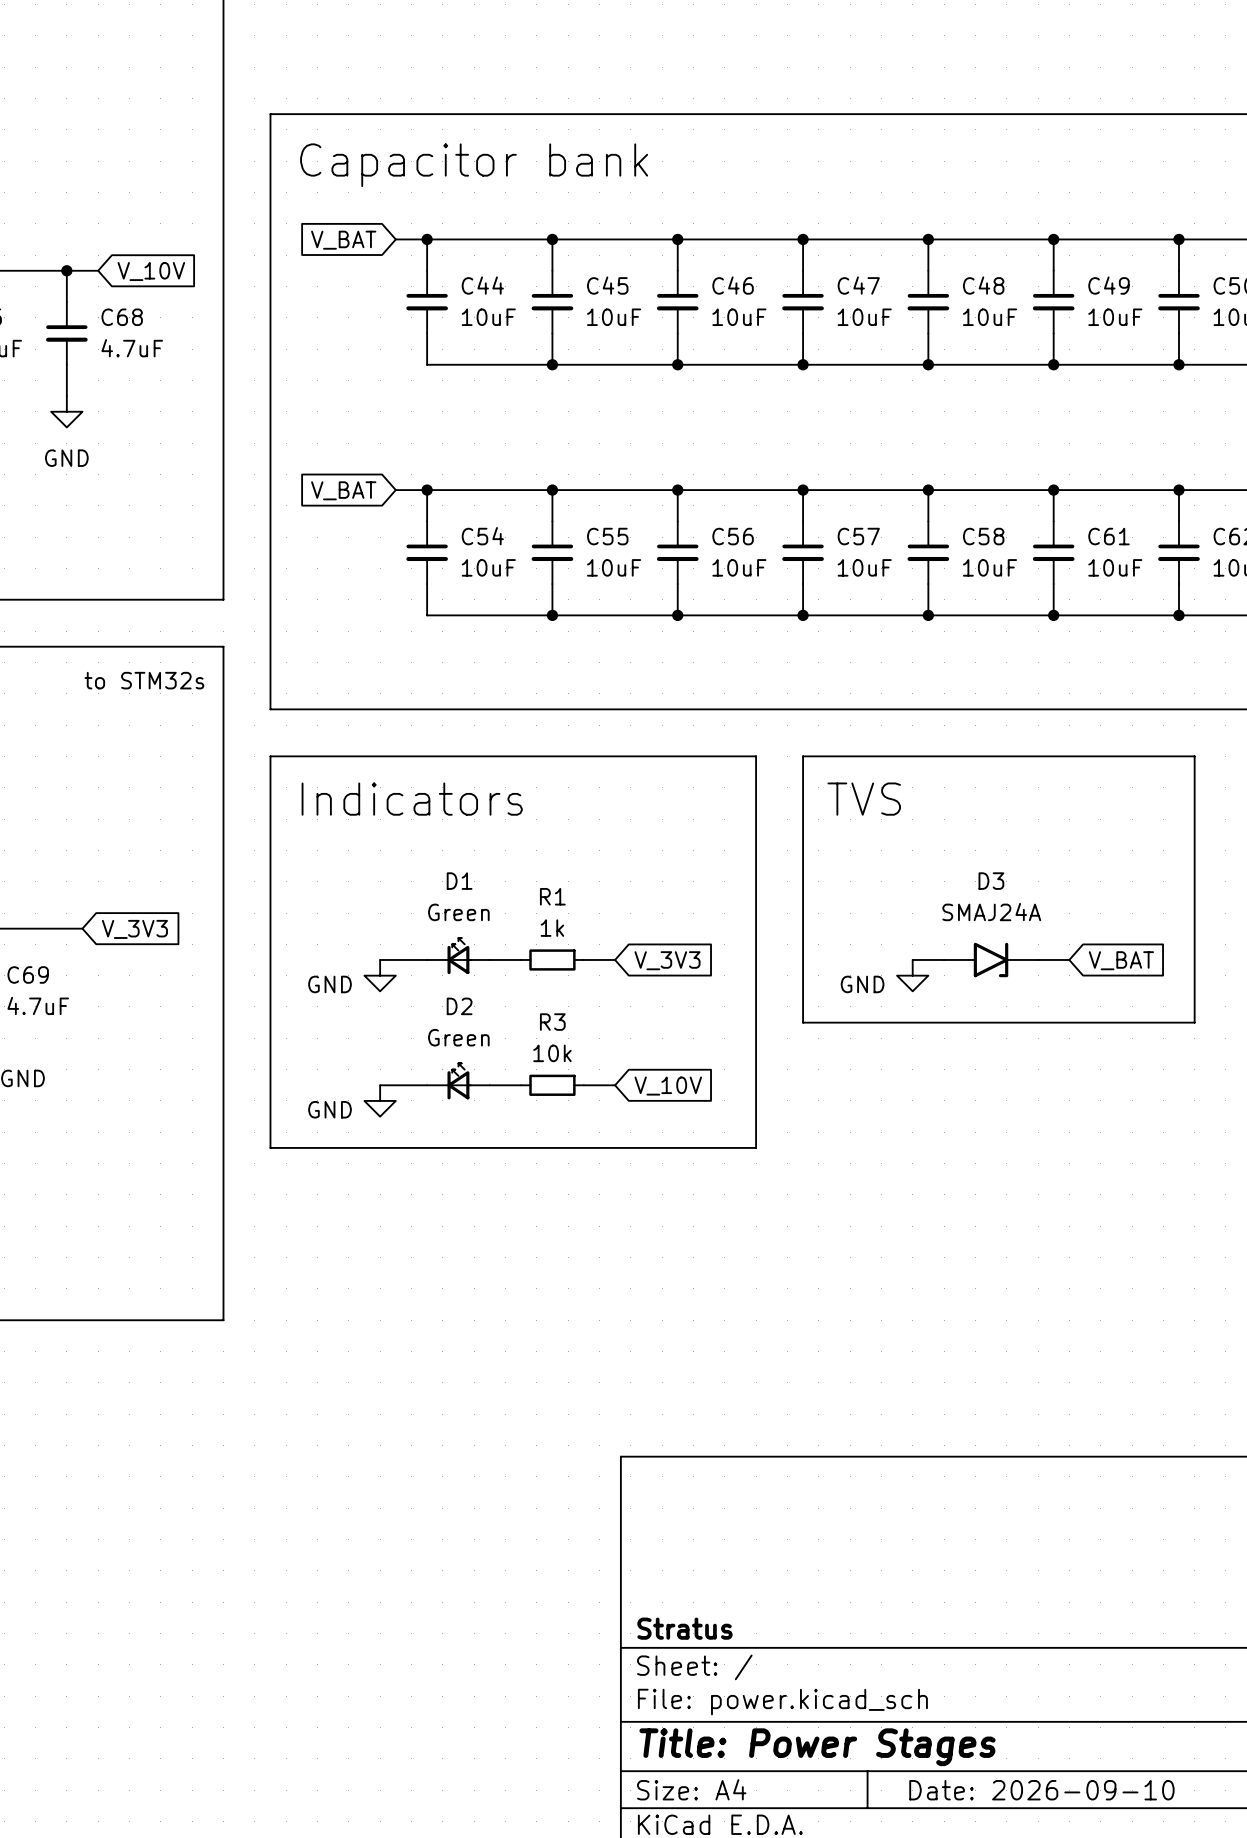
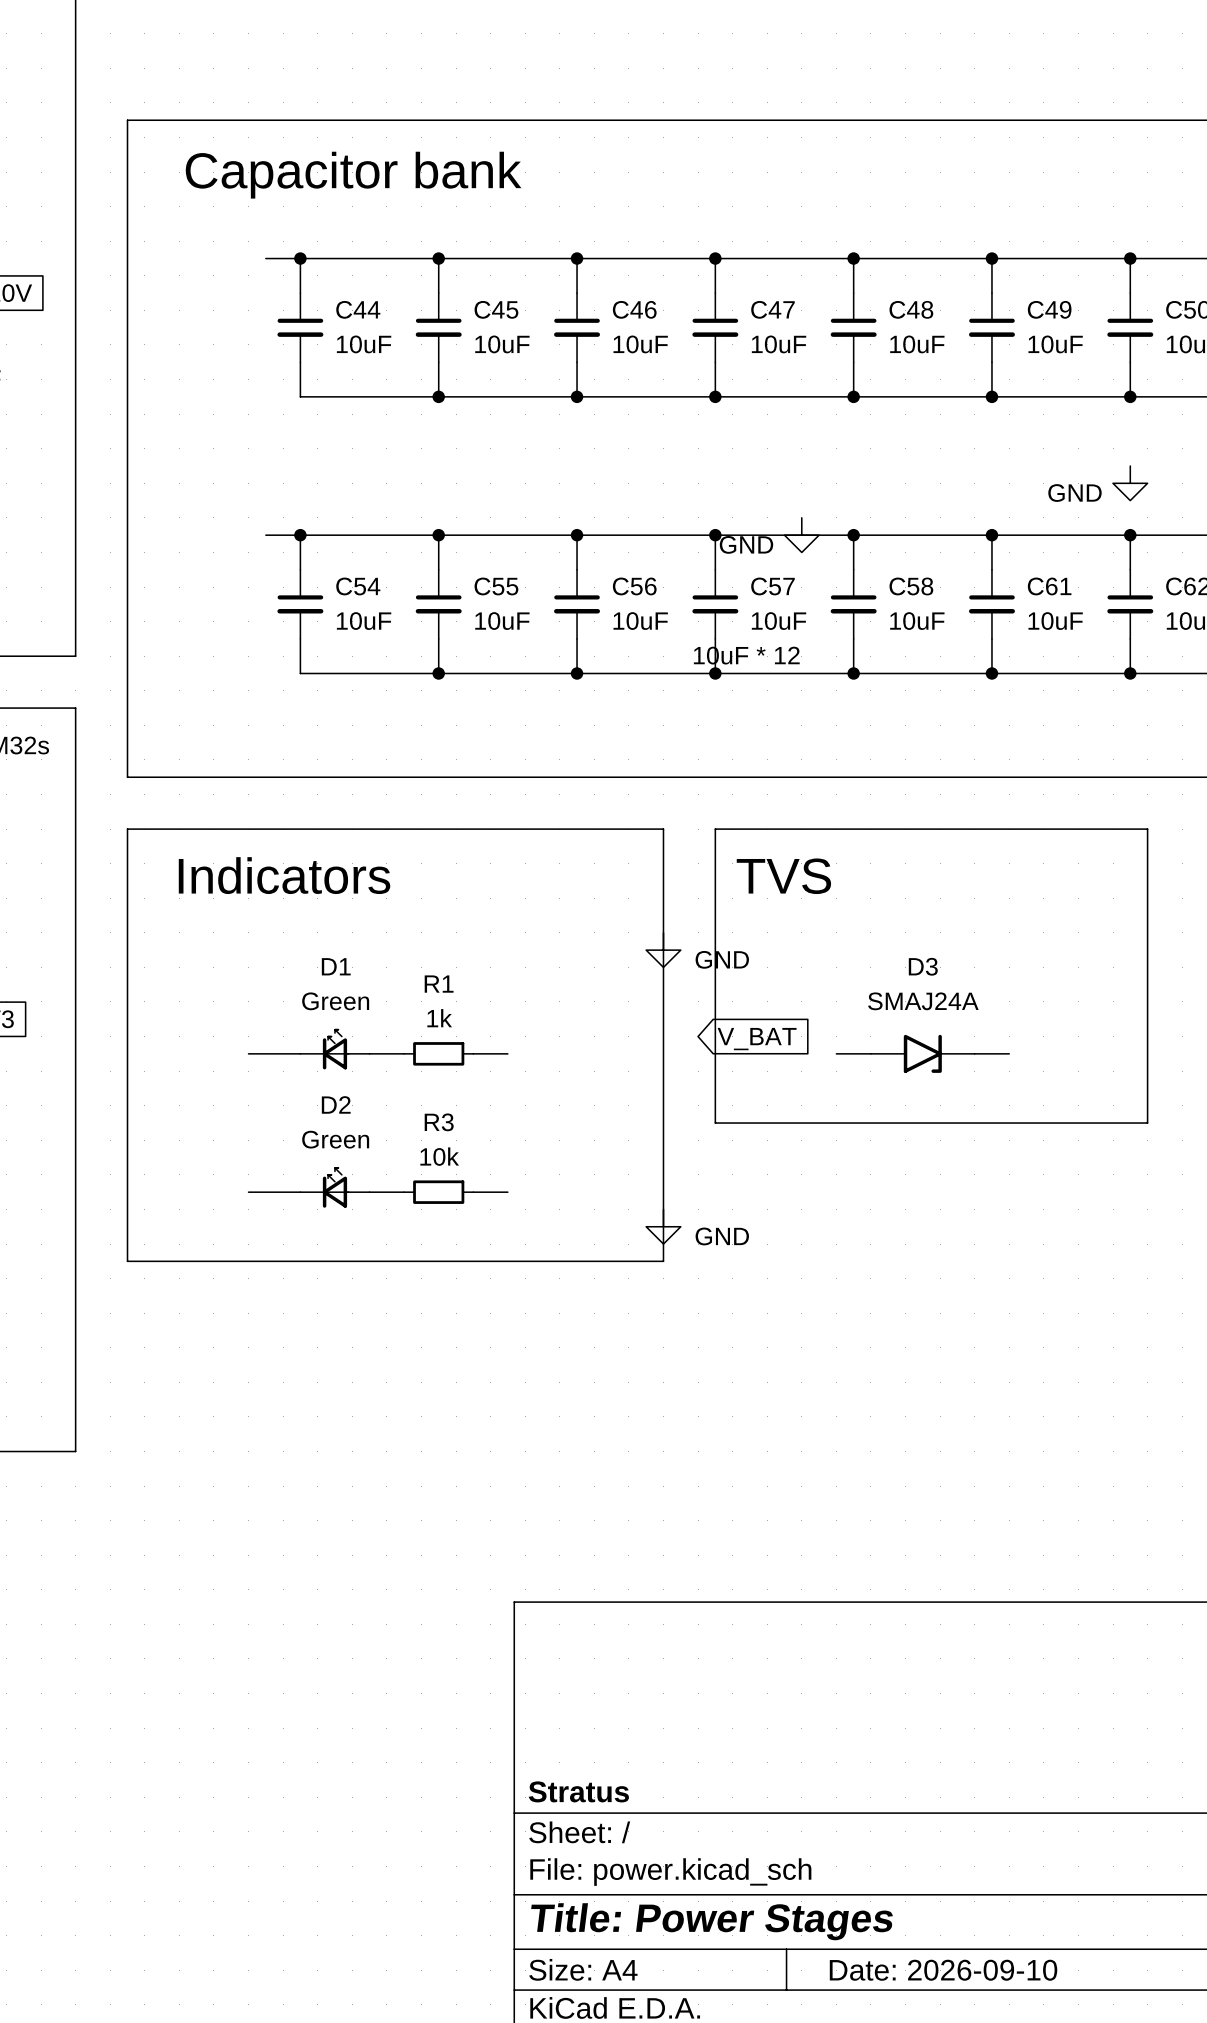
global label: V_BAT (343, 240) -> none
power symbol: none -> GND (1130, 483)
global label: V_BAT (343, 490) -> none
power symbol: none -> GND (801, 535)
text: none -> 10uF * 12 (746, 655)
power symbol: none -> GND (663, 950)
global label: V_3V3 (667, 960) -> none
global label position: V_BAT (1121, 960) -> V_BAT (757, 1039)
power symbol: GND (380, 975) -> none
power symbol: GND (912, 975) -> none
global label: V_10V (668, 1086) -> none
power symbol: GND (380, 1100) -> none
power symbol: none -> GND (663, 1226)

